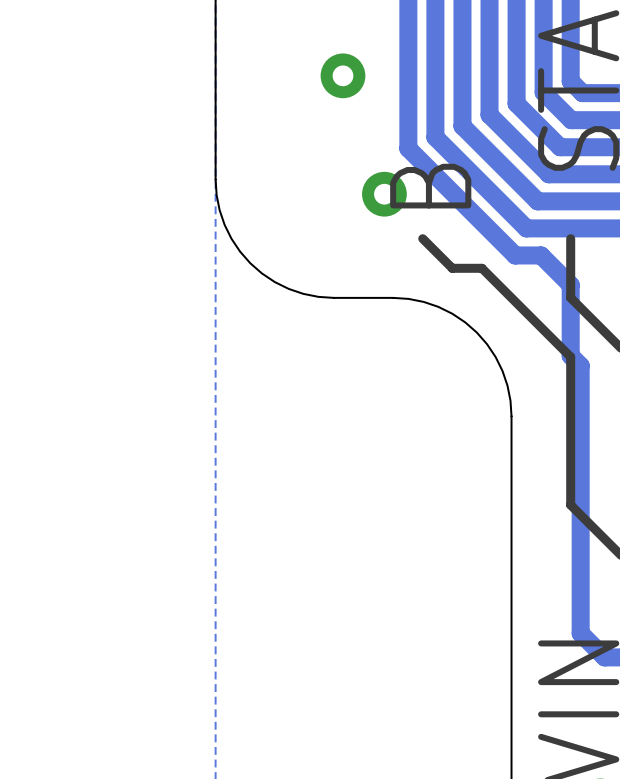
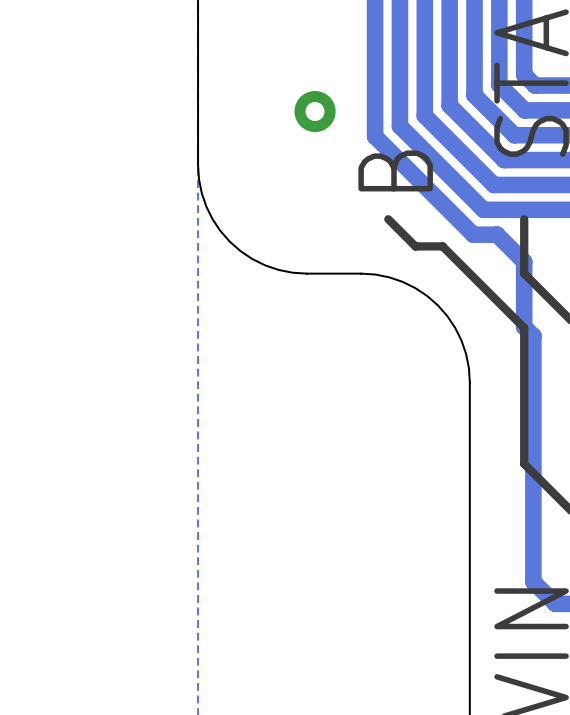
via: (342, 75) -> none
via: none -> (315, 111)
via: (384, 194) -> none

